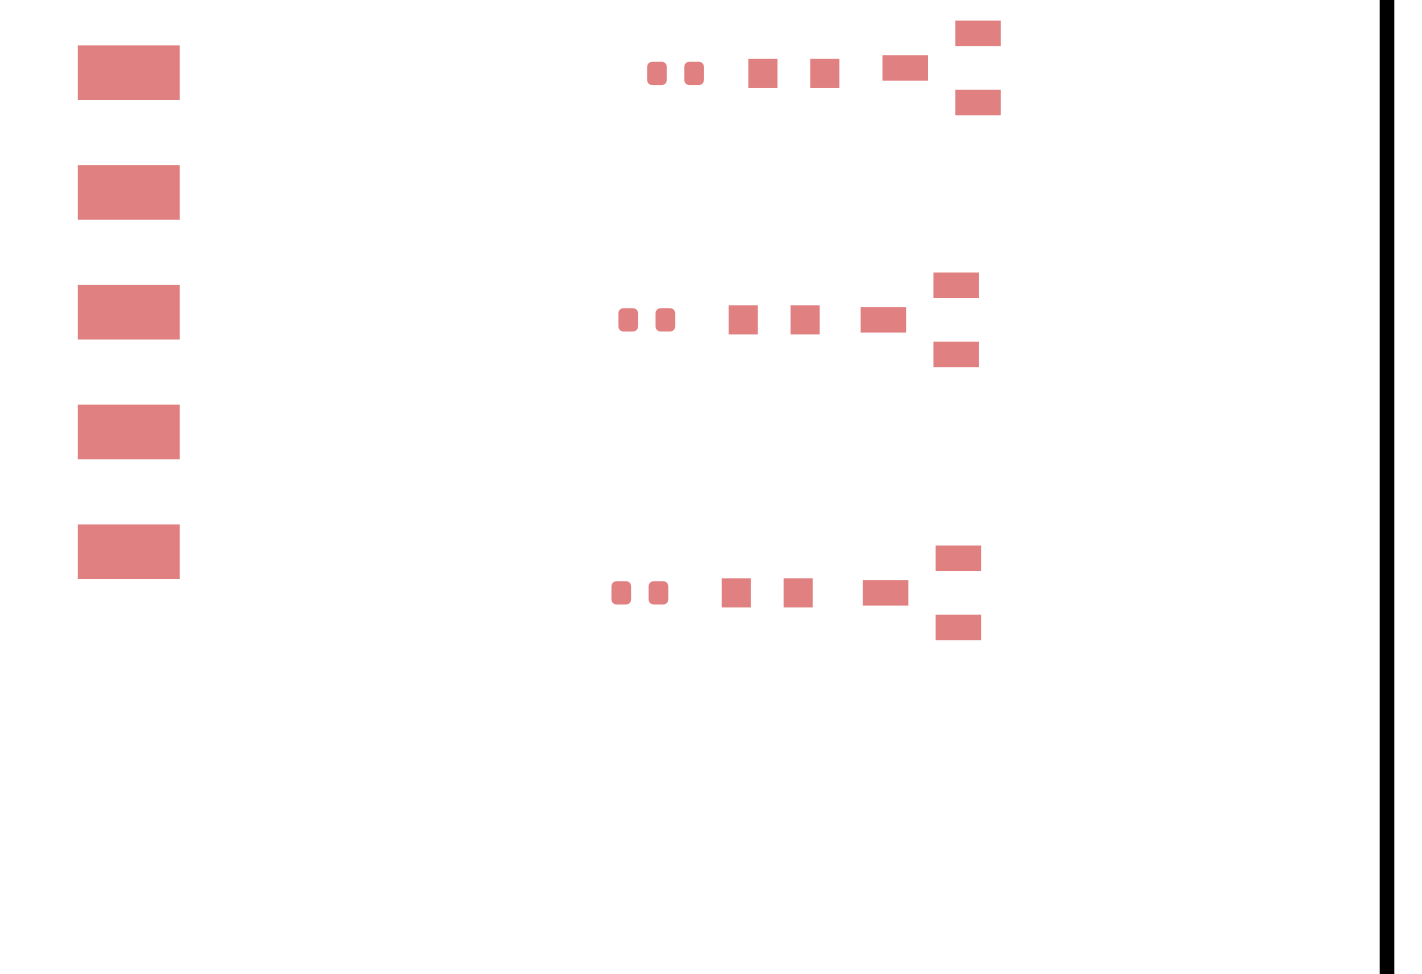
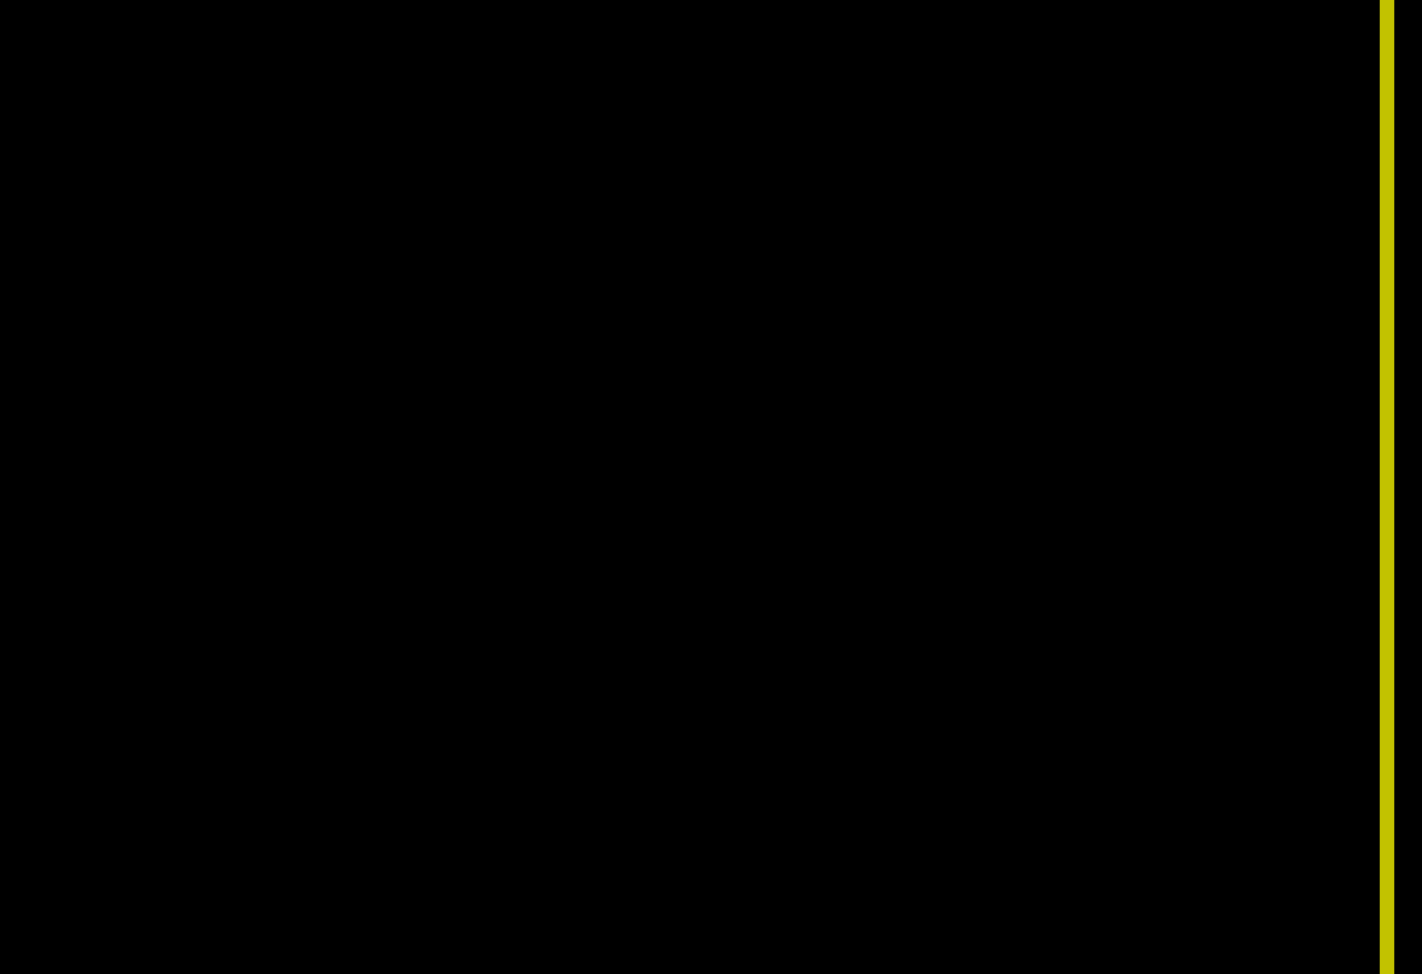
part: (941, 67) -> none
part: (128, 72) -> none
part: (675, 73) -> none
part: (793, 73) -> none
part: (128, 192) -> none
part: (128, 312) -> none
part: (646, 319) -> none
part: (774, 319) -> none
part: (919, 319) -> none
part: (128, 431) -> none
part: (128, 551) -> none
part: (639, 592) -> none
part: (767, 592) -> none
part: (921, 592) -> none

